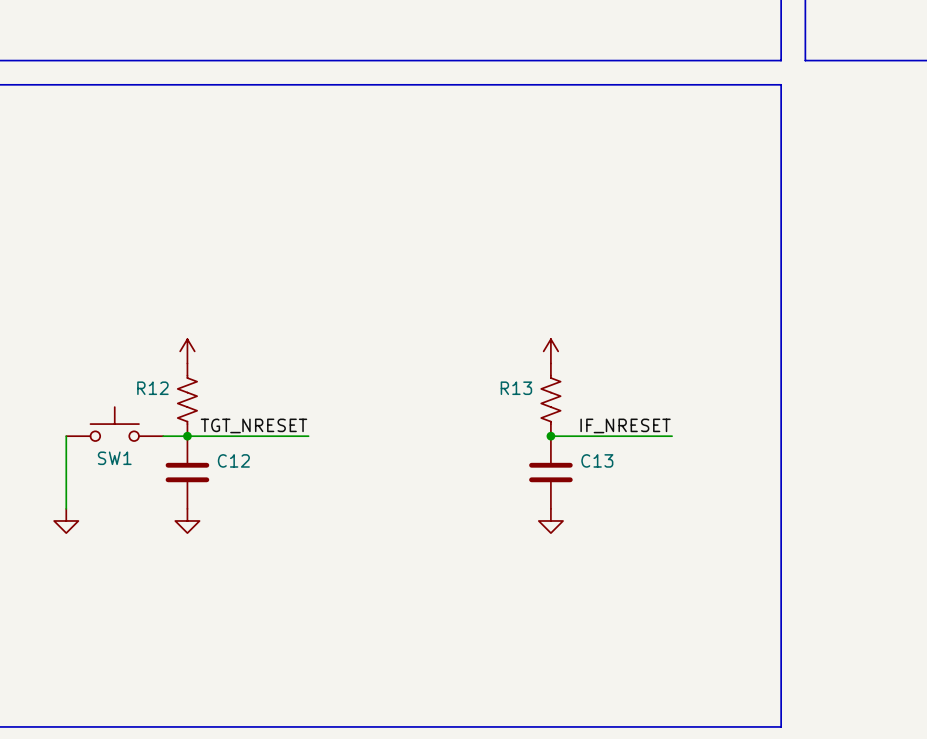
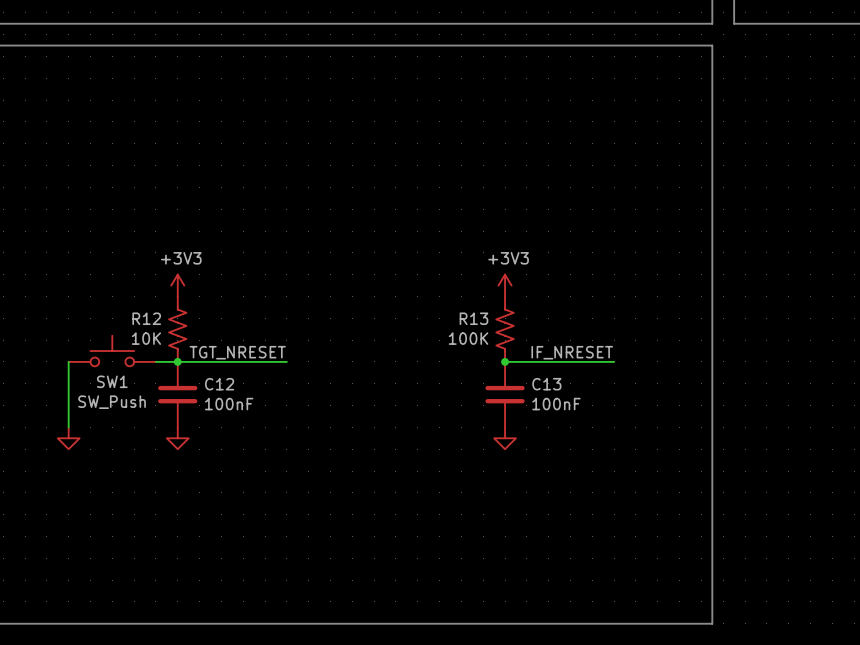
power symbol text: none -> +3V3 (181, 258)
power symbol text: none -> +3V3 (508, 258)
R12 value: none -> 10K (146, 338)
R13 value: none -> 100K (468, 338)
SW1 value: none -> SW_Push (112, 402)
C12 value: none -> 100nF (229, 404)
C13 value: none -> 100nF (556, 404)

